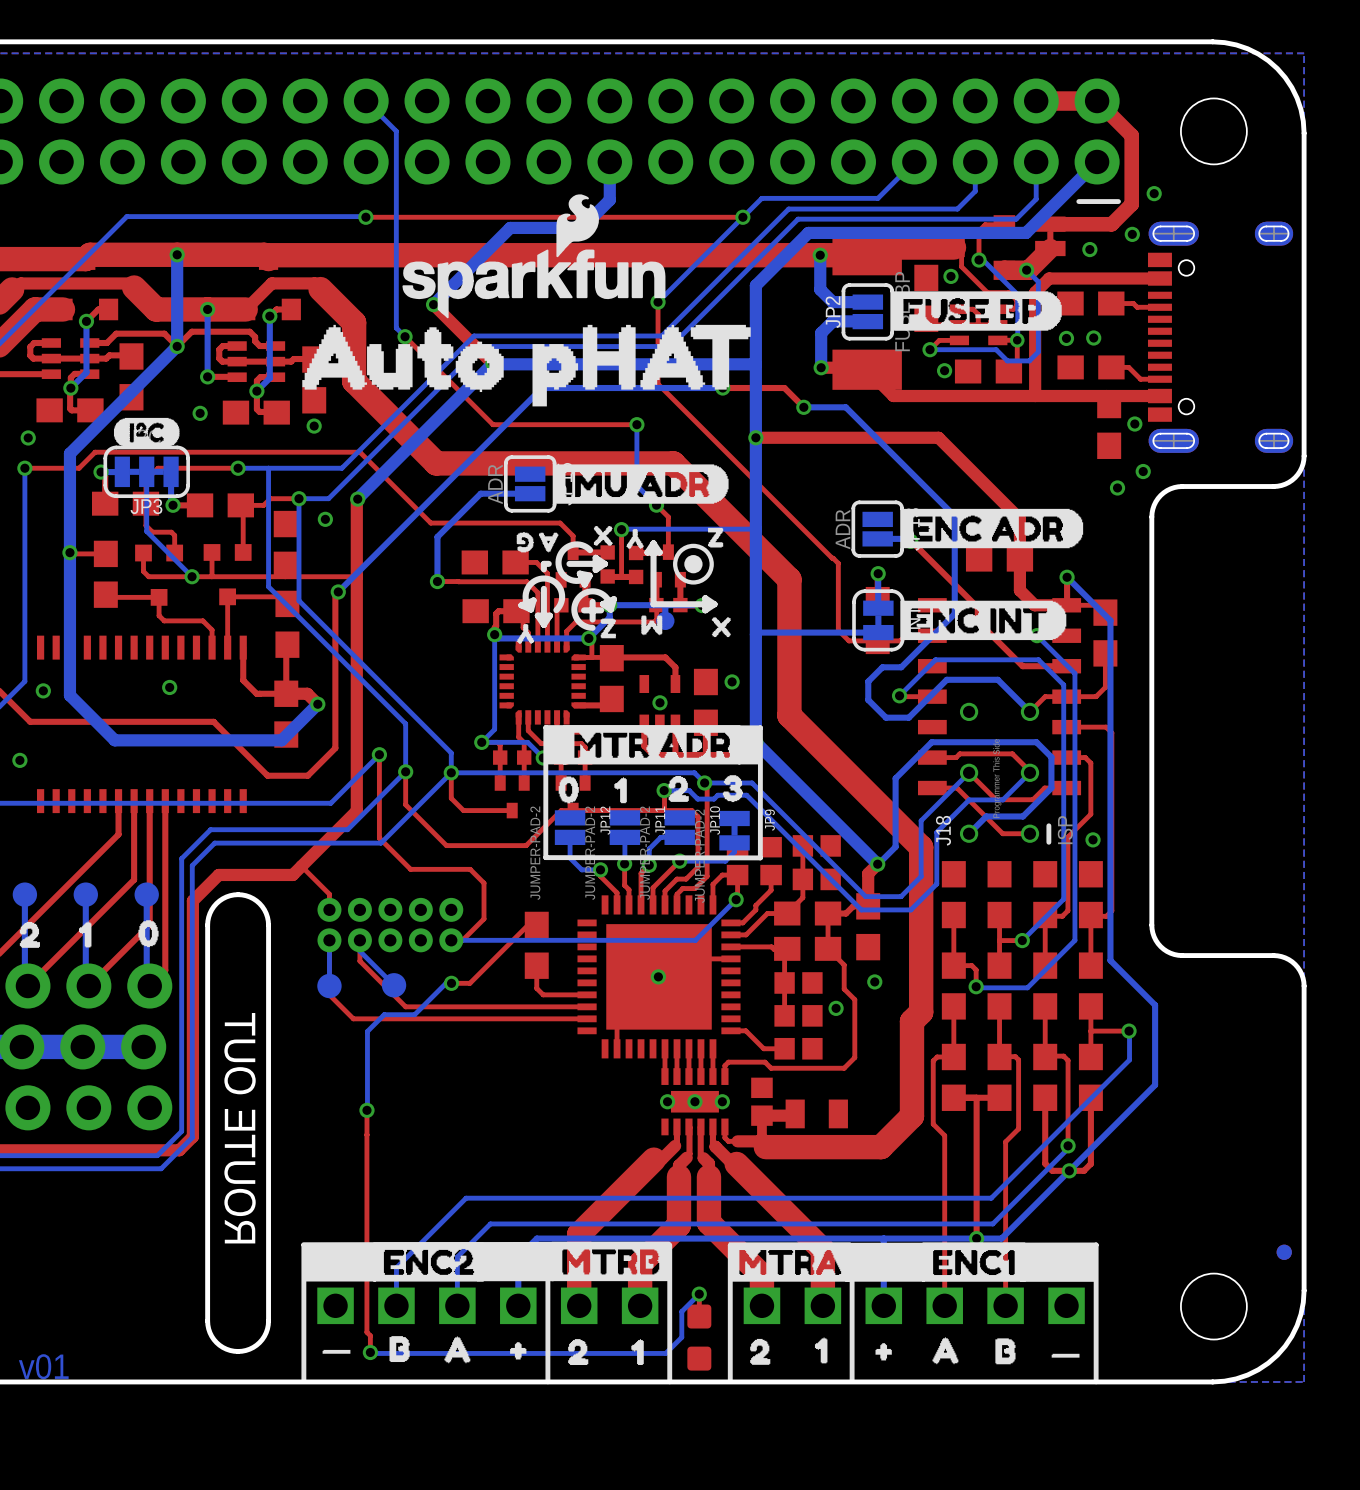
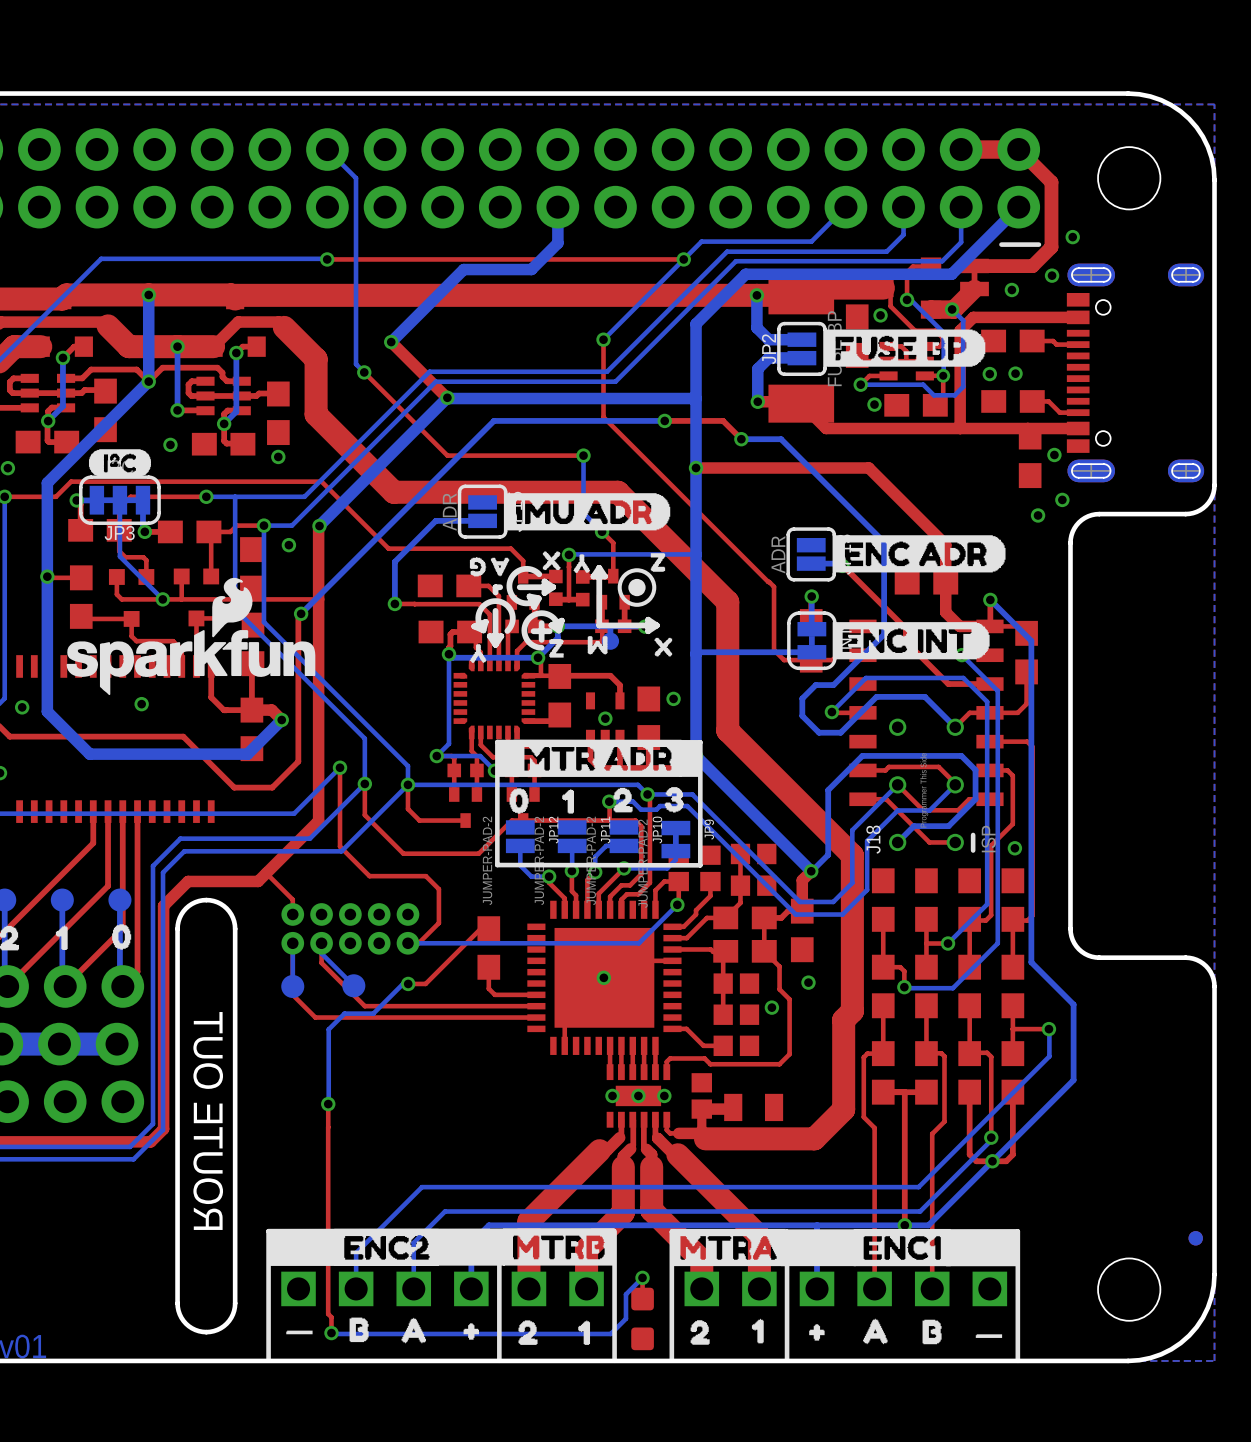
drawing position: (533, 256) -> (190, 636)
drawing: [302, 324, 751, 407] -> none

